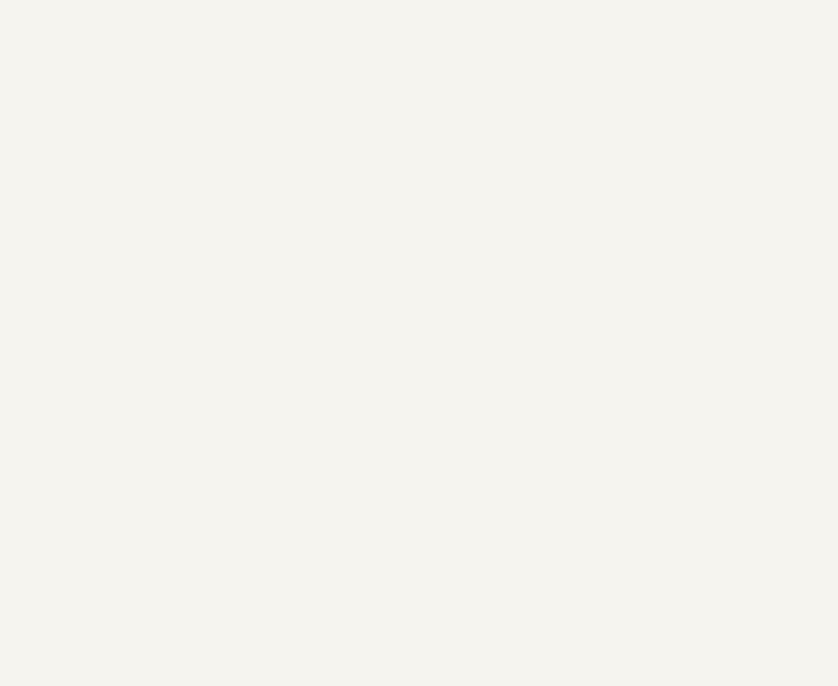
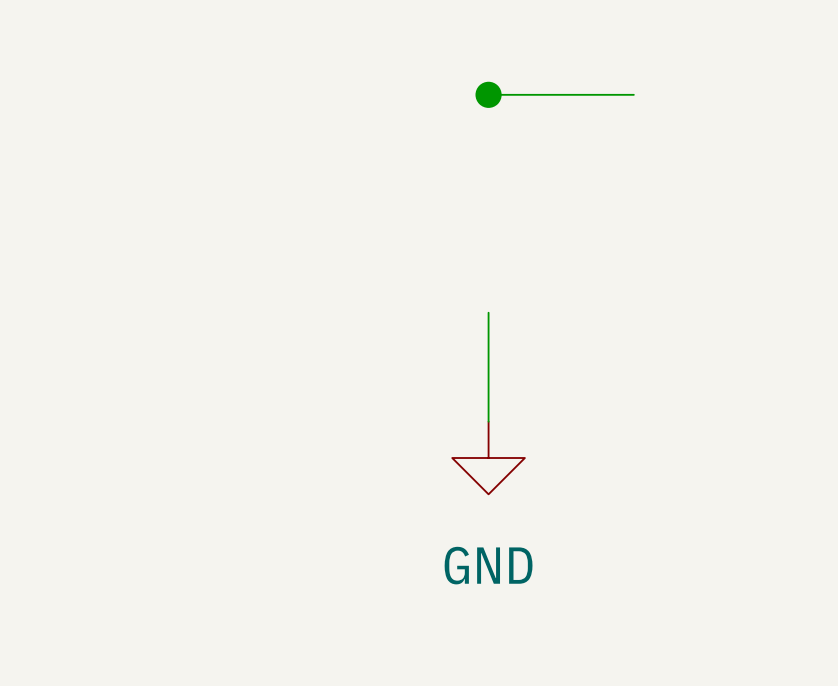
wire: none -> (488, 94) (633, 94)
junction: none -> (488, 94)
wire: none -> (488, 312) (488, 421)
power symbol: none -> GND (488, 458)

